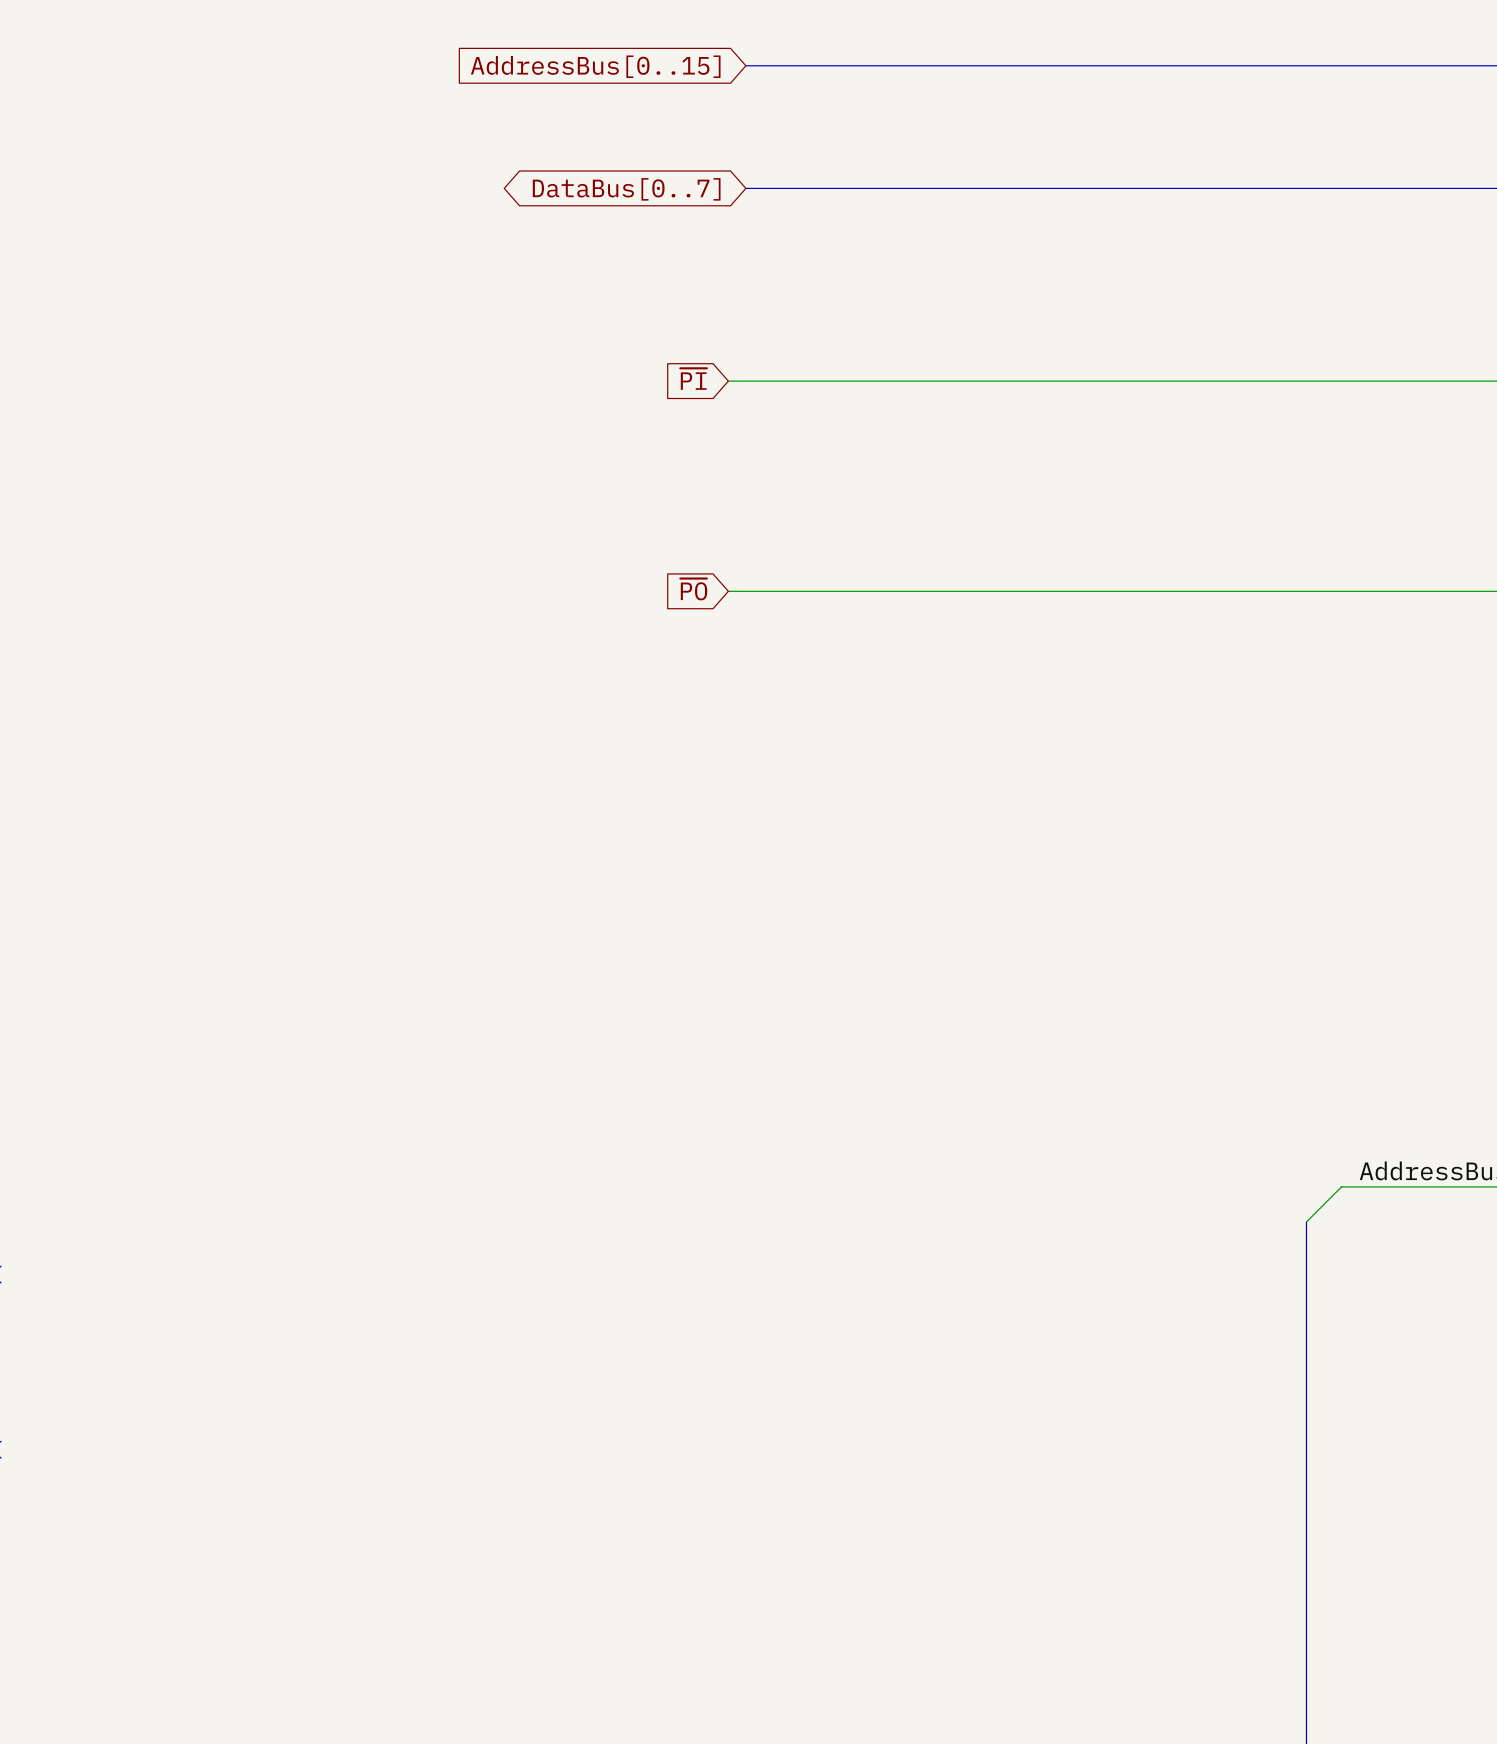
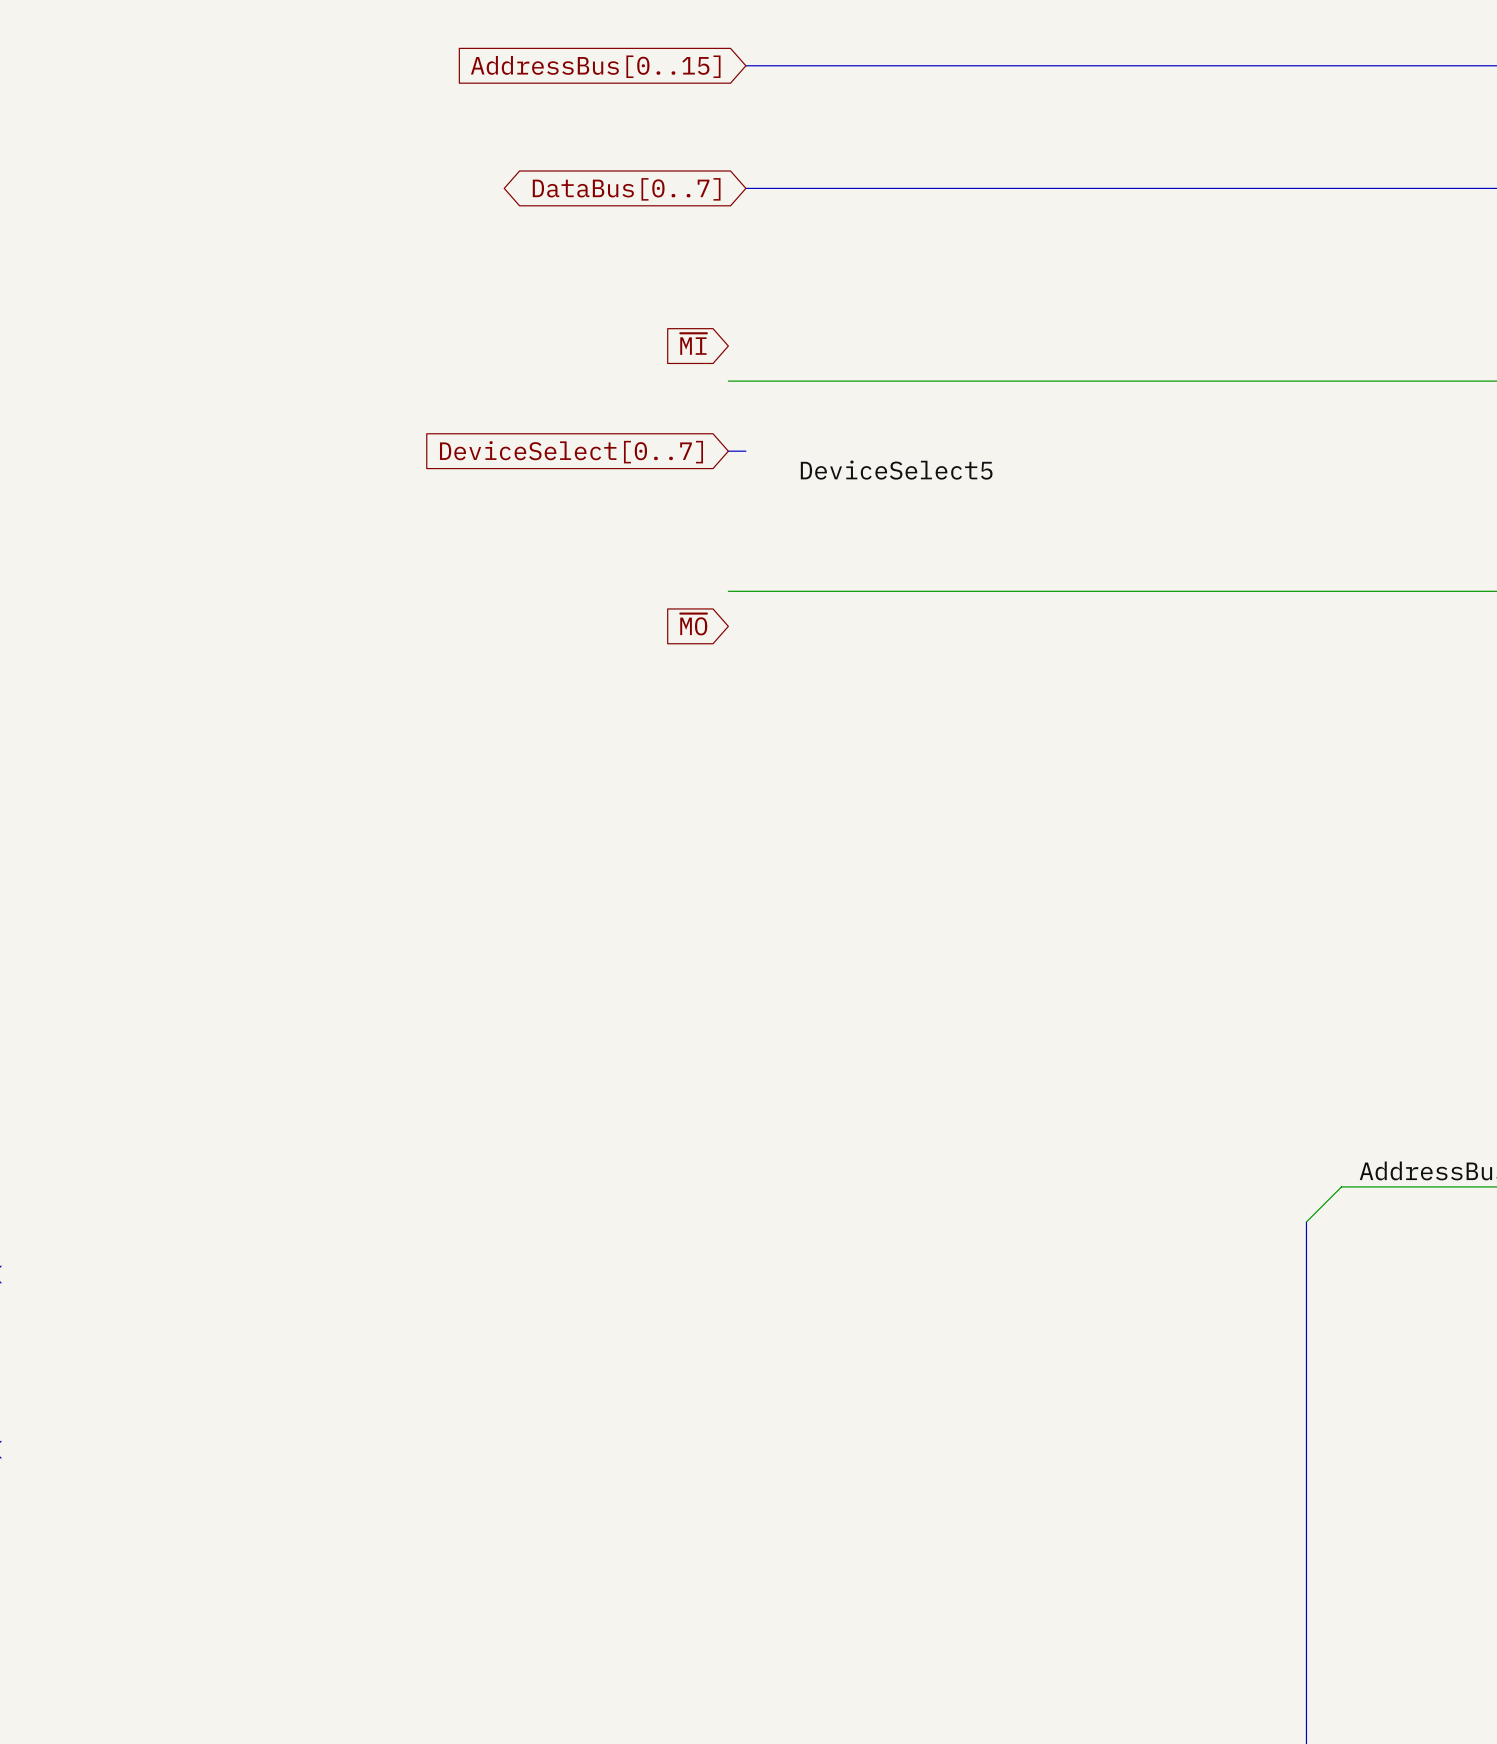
global label: ~{PI} (693, 379) -> ~{MI} (693, 344)
bus: none -> (728, 451) (745, 451)
global label: none -> DeviceSelect[0..7] (571, 452)
label: none -> DeviceSelect5 (896, 470)
global label: ~{PO} (693, 589) -> ~{MO} (693, 624)

